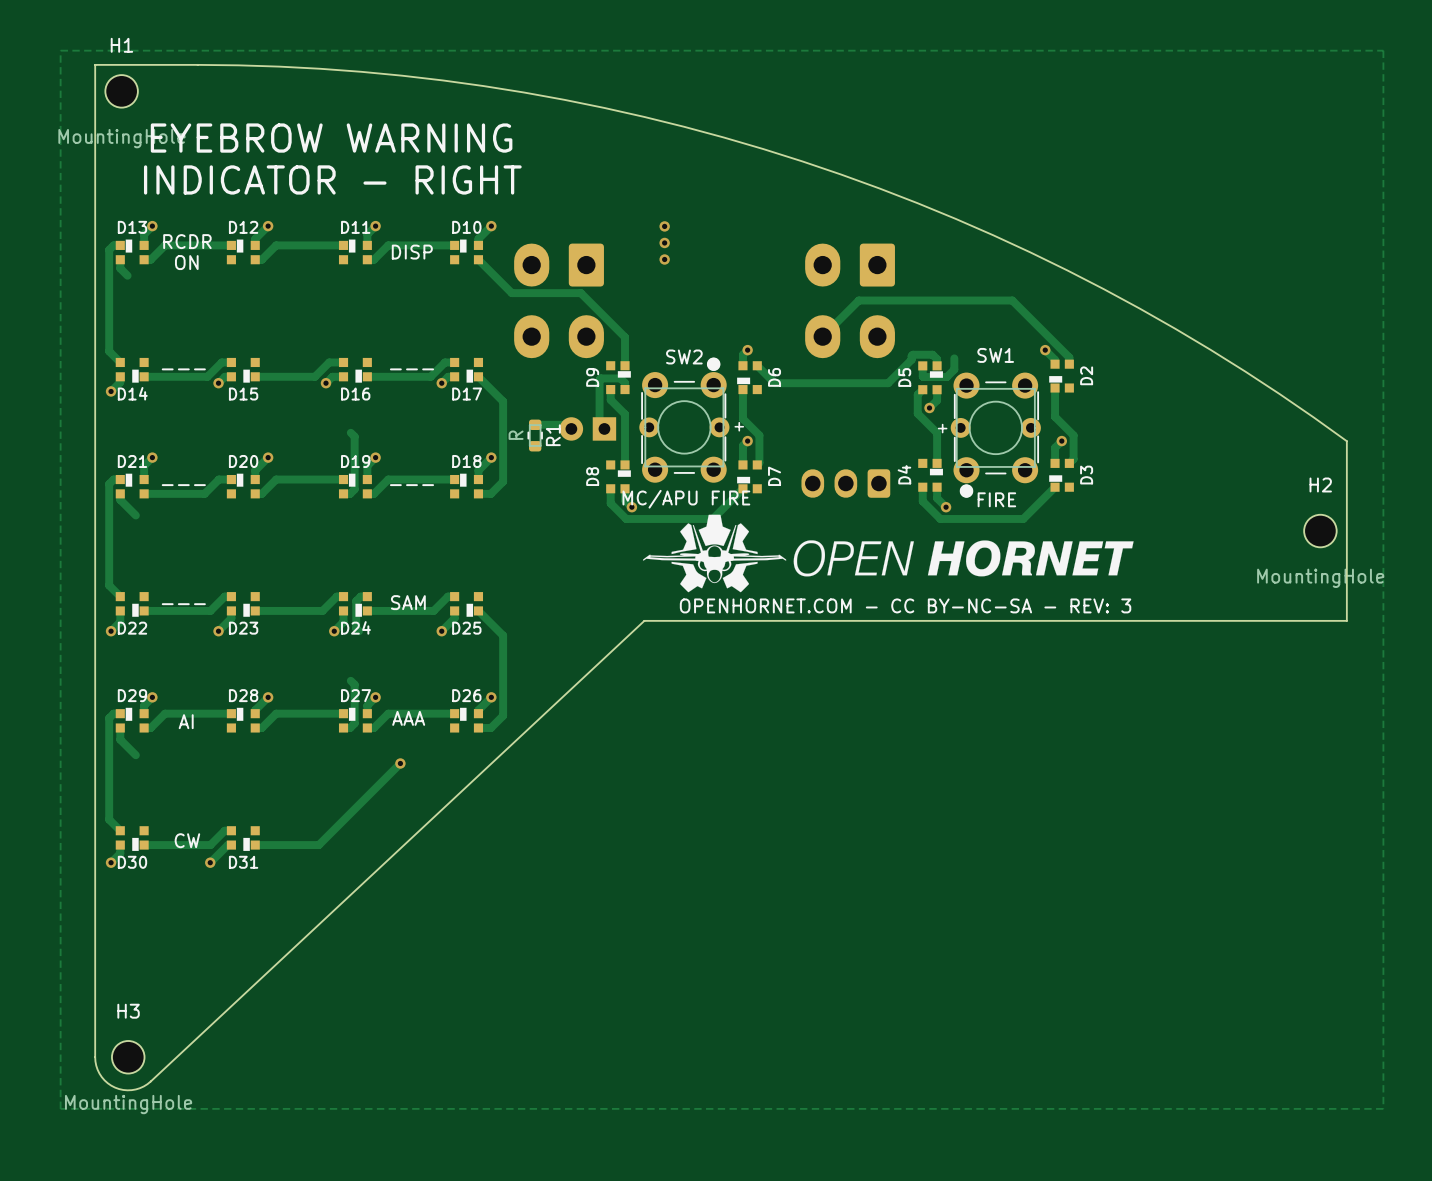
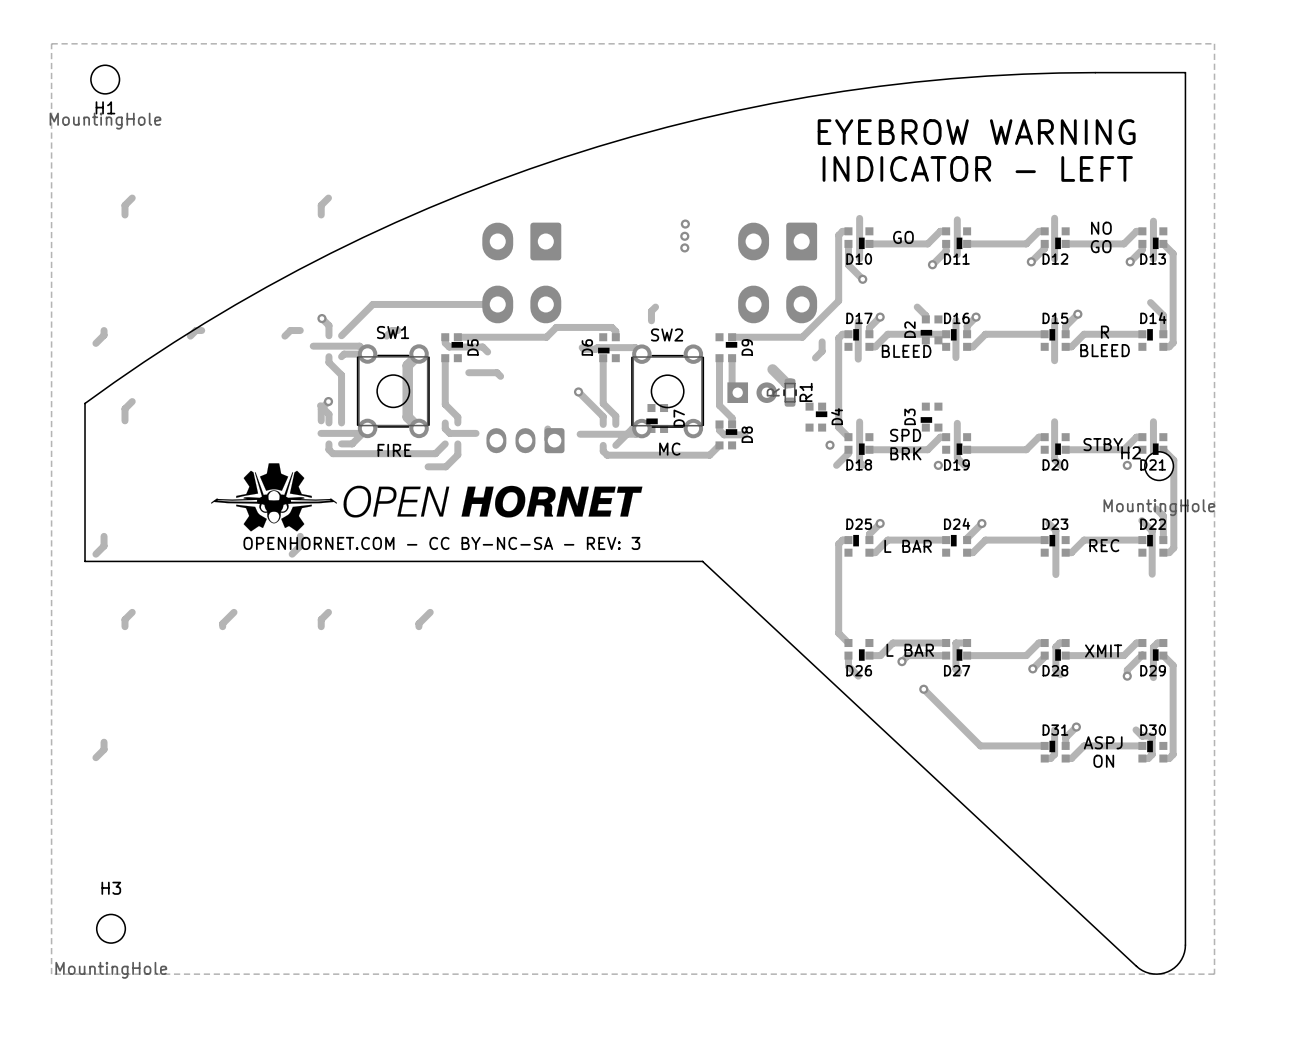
H1 name position: H1 (121, 45) -> H1 (105, 107)
board edge: (95, 64) (238, 65) (361, 71) (442, 80) (564, 99) (644, 116) (763, 149) (879, 188) (993, 235) (1067, 270) (1175, 328) (1245, 371) (1346, 441) (1346, 620) (644, 620) (150, 1081) (140, 1088) (131, 1090) (115, 1087) (104, 1080) (99, 1073) (95, 1057) (95, 64) -> (1095, 72) (1185, 72) (1185, 945) (1181, 959) (1167, 971) (1153, 973) (1136, 966) (702, 561) (85, 561) (85, 403) (144, 362) (204, 323) (298, 269) (363, 237) (428, 208) (529, 169) (598, 146) (702, 118) (772, 103) (879, 86) (987, 76) (1095, 72)
text: EYEBROW WARNING (331, 138) -> none
text: none -> EYEBROW WARNING (976, 132)
text: INDICATOR - RIGHT (332, 179) -> none
text: none -> INDICATOR - LEFT (977, 168)
via: (152, 226) -> none
track: (268, 226) (255, 239) (255, 245) -> none
via: (268, 226) -> none
via: (375, 226) -> none
track: (491, 226) (478, 239) (478, 245) -> none
via: (491, 226) -> none
via: (664, 226) -> none
text: RCDR (187, 241) -> none
via: (664, 242) -> none
track: (120, 245) (113, 245) (109, 249) (109, 351) (120, 362) -> none
track: (231, 245) (165, 245) (150, 259) (144, 259) -> none
track: (343, 245) (276, 245) (261, 259) (255, 259) -> none
track: (454, 245) (388, 245) (373, 259) (367, 259) -> none
track: none -> (859, 218) (859, 258)
track: none -> (1054, 218) (1054, 258)
track: none -> (957, 219) (957, 254)
D13 rotation: 0° (132, 251) -> 180° (1152, 238)
D13 position: (132, 251) -> (1152, 238)
D12 rotation: 0° (243, 251) -> 180° (1055, 238)
D12 position: (243, 251) -> (1055, 238)
D11 rotation: 0° (355, 251) -> 180° (956, 238)
D11 position: (355, 251) -> (956, 238)
D10 rotation: 0° (466, 251) -> 180° (858, 238)
D10 position: (466, 251) -> (858, 238)
text: DISP (412, 252) -> none
track: none -> (1153, 221) (1153, 258)
via: none -> (685, 224)
track: (120, 259) (120, 268) (127, 275) -> none
track: (478, 259) (511, 293) (580, 293) (625, 337) (625, 365) -> none
via: (664, 259) -> none
text: none -> NO (1101, 228)
text: ON (186, 262) -> none
track: none -> (848, 231) (842, 231) (838, 235) (838, 300) (802, 337) (732, 337)
track: none -> (946, 231) (940, 231) (927, 243) (869, 243)
track: none -> (1044, 231) (1038, 231) (1026, 243) (967, 243)
track: none -> (1142, 231) (1136, 231) (1123, 243) (1065, 243)
via: none -> (684, 236)
text: none -> GO (903, 237)
track: none -> (848, 243) (848, 265) (862, 279)
track: none -> (946, 243) (946, 251) (932, 264)
track: none -> (1044, 243) (1044, 248) (1031, 261)
track: none -> (1142, 243) (1142, 249) (1130, 261)
track: none -> (1163, 243) (1173, 253) (1173, 342) (1169, 346) (1163, 346)
text: none -> GO (1101, 246)
via: none -> (684, 247)
via: none -> (1031, 261)
via: none -> (1130, 261)
part position: (559, 300) -> (521, 272)
part position: (850, 300) -> (777, 272)
via: none -> (932, 264)
via: none -> (862, 279)
track: (822, 336) (858, 300) (1012, 300) (1069, 357) (1069, 364) -> none
track: none -> (1150, 302) (1163, 315) (1163, 334)
track: none -> (497, 304) (372, 304) (341, 335)
via: (747, 350) -> none
via: (1045, 350) -> none
SW2 footprint: [639, 357, 730, 483] -> [631, 344, 705, 439]
track: (954, 358) (954, 369) (946, 377) (923, 377) (922, 365) -> none
track: none -> (1077, 314) (1065, 326) (1065, 334)
via: none -> (1077, 314)
track: none -> (880, 317) (869, 327) (869, 334)
via: none -> (880, 317)
track: none -> (976, 317) (967, 326) (967, 334)
via: none -> (976, 317)
track: (231, 362) (221, 362) (207, 376) (144, 376) -> none
track: (343, 362) (329, 362) (314, 376) (255, 376) -> none
track: (454, 362) (445, 362) (430, 376) (367, 376) -> none
track: none -> (321, 318) (328, 325) (328, 335)
via: none -> (321, 318)
track: none -> (1054, 320) (1054, 360)
track: (757, 365) (774, 383) (888, 383) (911, 359) (912, 354) (932, 354) (937, 359) (937, 365) -> none
track: none -> (955, 320) (955, 357)
track: none -> (858, 321) (858, 359)
text: --- (183, 369) -> none
text: --- (411, 369) -> none
D14 rotation: 0° (132, 370) -> 180° (1152, 339)
D14 position: (132, 370) -> (1152, 339)
D15 rotation: 0° (243, 370) -> 180° (1055, 339)
D15 position: (243, 370) -> (1055, 339)
D16 rotation: 0° (355, 370) -> 180° (956, 339)
D16 position: (355, 370) -> (956, 339)
D17 rotation: 0° (466, 370) -> 180° (858, 339)
D17 position: (466, 370) -> (858, 339)
SW1 footprint: [950, 372, 1041, 498] -> [356, 344, 430, 439]
D2 name position: D2 (1086, 375) -> D2 (909, 329)
track: (478, 376) (503, 401) (503, 481) (490, 493) (478, 493) -> none
D9 name position: D9 (592, 377) -> D9 (747, 347)
D9 position: (618, 377) -> (726, 347)
D6 position: (749, 377) -> (608, 347)
D6 name position: D6 (774, 377) -> D6 (587, 347)
D5 name position: D5 (904, 377) -> D5 (472, 347)
D5 position: (930, 377) -> (452, 347)
text: none -> R (1105, 332)
track: none -> (848, 334) (842, 334) (838, 338) (838, 427) (848, 437)
track: none -> (946, 334) (887, 334) (875, 346) (869, 346)
track: none -> (1044, 334) (985, 334) (972, 346) (967, 346)
track: none -> (1142, 334) (1084, 334) (1071, 346) (1065, 346)
via: (218, 383) -> none
via: (326, 383) -> none
via: (441, 383) -> none
track: none -> (445, 337) (445, 343) (449, 347) (482, 347) (487, 351)
track: none -> (457, 337) (546, 337) (556, 327) (611, 327) (615, 331) (615, 337)
track: (1055, 388) (1055, 416) (1073, 435) (1073, 459) (1069, 463) -> none
track: (610, 389) (610, 399) (625, 414) (625, 464) -> none
track: (625, 389) (625, 382) (620, 378) (599, 379) (599, 424) (604, 428) -> none
track: (742, 389) (742, 418) (759, 435) (759, 462) (757, 464) -> none
track: (922, 389) (917, 394) (917, 413) (937, 433) (937, 463) -> none
via: (111, 391) -> none
track: none -> (313, 346) (359, 346) (367, 354) (344, 354) (341, 356)
track: none -> (582, 347) (583, 349) (635, 347) (641, 354)
text: none -> BLEED (1105, 350)
text: none -> BLEED (906, 351)
track: none -> (419, 354) (407, 365) (407, 417) (419, 428)
track: none -> (328, 356) (328, 362) (341, 375) (341, 422)
via: (929, 407) -> none
track: none -> (445, 358) (445, 404) (457, 417) (457, 422)
track: none -> (603, 358) (603, 403) (615, 416) (615, 424)
track: none -> (719, 358) (719, 405) (732, 418) (732, 424)
track: none -> (732, 358) (732, 387) (737, 392)
track: none -> (772, 369) (786, 383) (790, 383)
part rotation: 0° (587, 428) -> 180° (752, 392)
part position: (587, 428) -> (752, 392)
track: (350, 432) (354, 436) (354, 489) (350, 493) (343, 493) -> none
R1 position: (535, 435) -> (790, 392)
track: (747, 441) (742, 445) (742, 464) -> none
via: (747, 441) -> none
track: (1061, 441) (1055, 447) (1055, 463) -> none
via: (1061, 441) -> none
track: none -> (578, 391) (603, 416) (603, 424)
via: none -> (578, 391)
via: (152, 457) -> none
track: (268, 457) (255, 470) (255, 479) -> none
via: (268, 457) -> none
track: (491, 457) (478, 470) (478, 479) -> none
via: (491, 457) -> none
track: none -> (320, 405) (328, 414) (328, 422)
D4 name position: D4 (904, 474) -> D4 (837, 416)
D3 name position: D3 (1086, 475) -> D3 (909, 416)
D8 name position: D8 (592, 476) -> D8 (747, 434)
D8 position: (618, 476) -> (726, 434)
track: (120, 479) (113, 479) (109, 484) (109, 585) (120, 596) -> none
track: (231, 479) (218, 479) (204, 493) (144, 493) -> none
track: (343, 479) (276, 479) (261, 493) (255, 493) -> none
track: (454, 479) (388, 479) (373, 493) (367, 493) -> (362, 433) (320, 433)
track: none -> (859, 421) (859, 462) (862, 465)
track: none -> (1054, 421) (1054, 459) (1060, 465)
track: none -> (1153, 421) (1153, 462)
track: none -> (445, 422) (445, 428) (449, 433) (476, 433)
track: none -> (957, 423) (957, 458) (964, 465)
track: none -> (719, 424) (719, 430) (724, 434) (744, 434)
part position: (845, 483) -> (525, 440)
H2 name position: H2 (1320, 484) -> H2 (1131, 452)
text: --- (183, 485) -> none
text: --- (411, 485) -> none
D21 rotation: 0° (132, 486) -> 180° (1152, 444)
D21 position: (132, 486) -> (1152, 444)
D20 rotation: 0° (243, 486) -> 180° (1055, 444)
D20 position: (243, 486) -> (1055, 444)
D19 rotation: 0° (355, 486) -> 180° (956, 444)
D19 position: (355, 486) -> (956, 444)
D18 rotation: 0° (466, 486) -> 180° (858, 444)
D18 position: (466, 486) -> (858, 444)
track: (922, 487) (922, 501) (940, 518) (1023, 518) (1055, 487) -> none
track: (937, 487) (937, 498) (946, 507) -> none
track: none -> (367, 428) (352, 443) (341, 443)
track: (610, 488) (610, 503) (626, 518) (712, 518) (742, 488) -> none
track: (120, 493) (120, 499) (135, 515) -> none
track: none -> (580, 434) (636, 434) (641, 428) (632, 428) (615, 445)
text: none -> SPD (905, 435)
track: none -> (946, 437) (940, 437) (927, 449) (869, 449)
track: none -> (1044, 437) (1038, 437) (1026, 449) (967, 449)
track: none -> (1142, 437) (1136, 437) (1123, 449) (1065, 449)
SW2 value: MC/APU FIRE (686, 499) -> MC (669, 449)
track: none -> (328, 443) (328, 449) (332, 453) (435, 453) (445, 443)
track: none -> (457, 443) (457, 454) (445, 466) (428, 466)
text: none -> STBY (1103, 444)
via: (631, 507) -> none
track: none -> (603, 445) (603, 451) (607, 455) (709, 455) (719, 445)
track: none -> (848, 449) (848, 453) (836, 465)
track: none -> (1163, 449) (1173, 460) (1173, 548) (1169, 552) (1163, 552)
drawing: [642, 514, 1134, 593] -> none
text: none -> BRK (905, 453)
drawing: none -> [210, 463, 643, 532]
via: none -> (938, 465)
via: none -> (1127, 465)
track: none -> (1156, 508) (1163, 515) (1163, 540)
track: none -> (1141, 520) (1152, 530) (1152, 574)
track: (231, 596) (224, 596) (210, 610) (144, 610) -> none
track: (343, 596) (336, 596) (322, 610) (255, 610) -> none
track: (367, 596) (360, 596) (356, 601) (356, 628) (359, 631) -> none
track: (454, 596) (448, 596) (433, 610) (367, 610) -> none
track: none -> (880, 523) (869, 534) (869, 540)
via: none -> (880, 523)
track: none -> (981, 523) (967, 540)
via: none -> (981, 523)
track: none -> (1048, 523) (1055, 530) (1055, 574)
text: SAM (408, 602) -> none
D22 rotation: 0° (132, 604) -> 180° (1152, 545)
D22 position: (132, 604) -> (1152, 545)
text: --- (183, 604) -> none
D23 rotation: 0° (243, 604) -> 180° (1055, 545)
D23 position: (243, 604) -> (1055, 545)
D24 rotation: 0° (355, 604) -> 180° (956, 545)
D24 position: (355, 604) -> (956, 545)
D25 rotation: 0° (466, 604) -> 180° (858, 545)
D25 position: (466, 604) -> (858, 545)
text: OPENHORNET.COM - CC BY-NC-SA - REV: 3 (905, 605) -> none
track: (231, 610) (231, 618) (218, 631) -> none
track: (454, 610) (454, 618) (441, 631) -> none
track: (478, 610) (503, 635) (503, 715) (490, 727) (478, 727) -> none
track: none -> (848, 540) (842, 540) (838, 544) (838, 633) (848, 643)
track: none -> (946, 540) (887, 540) (875, 552) (869, 552)
track: none -> (1044, 540) (985, 540) (972, 552) (967, 552)
track: none -> (1142, 540) (1084, 540) (1071, 552) (1065, 552)
text: none -> OPENHORNET.COM - CC BY-NC-SA - REV: 3 (441, 543)
text: none -> REC (1104, 545)
text: none -> L BAR (908, 546)
via: (111, 631) -> none
via: (218, 631) -> none
via: (334, 631) -> none
via: (441, 631) -> none
track: (350, 680) (354, 684) (354, 723) (350, 727) (343, 727) -> none
via: (152, 697) -> none
via: (268, 697) -> none
via: (375, 697) -> none
via: (491, 697) -> none
track: (120, 713) (113, 713) (109, 718) (109, 819) (120, 830) -> none
track: (231, 713) (165, 713) (150, 727) (144, 727) -> none
track: (343, 713) (276, 713) (261, 727) (255, 727) -> none
track: (454, 713) (388, 713) (373, 727) (367, 727) -> none
text: AAA (408, 718) -> none
D29 rotation: 0° (132, 720) -> 180° (1152, 649)
D29 position: (132, 720) -> (1152, 649)
D28 rotation: 0° (243, 720) -> 180° (1055, 649)
D28 position: (243, 720) -> (1055, 649)
D27 rotation: 0° (355, 720) -> 180° (956, 649)
D27 position: (355, 720) -> (956, 649)
D26 rotation: 0° (466, 720) -> 180° (858, 649)
D26 position: (466, 720) -> (858, 649)
text: AI (186, 721) -> none
track: (120, 727) (120, 739) (135, 755) -> none
track: none -> (946, 643) (892, 643) (880, 655) (869, 655)
track: none -> (967, 643) (955, 643) (955, 669) (958, 671)
track: none -> (1044, 643) (1038, 643) (1026, 655) (967, 655)
track: none -> (1065, 643) (1059, 643) (1055, 646) (1055, 670) (1060, 674)
track: none -> (1142, 643) (1136, 643) (1123, 655) (1065, 655)
track: none -> (1163, 643) (1157, 643) (1153, 647) (1153, 677)
text: none -> L BAR (910, 650)
text: none -> XMIT (1103, 651)
track: none -> (848, 655) (848, 666) (858, 676)
track: none -> (946, 655) (907, 655) (901, 661)
track: none -> (1044, 655) (1032, 668)
track: none -> (1142, 655) (1127, 670) (1127, 676)
track: none -> (1163, 655) (1173, 665) (1173, 754) (1169, 758) (1163, 758)
via: none -> (901, 661)
via: none -> (1032, 668)
track: (400, 763) (318, 845) (255, 845) -> none
via: (400, 763) -> none
via: none -> (1127, 676)
track: none -> (923, 689) (980, 745) (1044, 745)
via: none -> (923, 689)
track: none -> (1076, 727) (1065, 737) (1065, 745)
via: none -> (1076, 727)
track: (231, 830) (224, 830) (210, 845) (144, 845) -> none
track: none -> (1054, 729) (1054, 754) (1050, 758) (1044, 758)
track: none -> (1136, 729) (1142, 736) (1152, 737) (1152, 754) (1148, 758) (1142, 758)
D30 rotation: 0° (132, 838) -> 180° (1152, 751)
D30 position: (132, 838) -> (1152, 751)
D31 rotation: 0° (243, 838) -> 180° (1055, 751)
D31 position: (243, 838) -> (1055, 751)
text: CW (187, 840) -> none
track: (231, 845) (227, 845) (210, 862) -> none
text: none -> ASPJ (1103, 742)
track: none -> (1142, 745) (1084, 745) (1071, 758) (1065, 758)
via: (111, 862) -> none
via: (210, 862) -> none
text: none -> ON (1103, 761)

